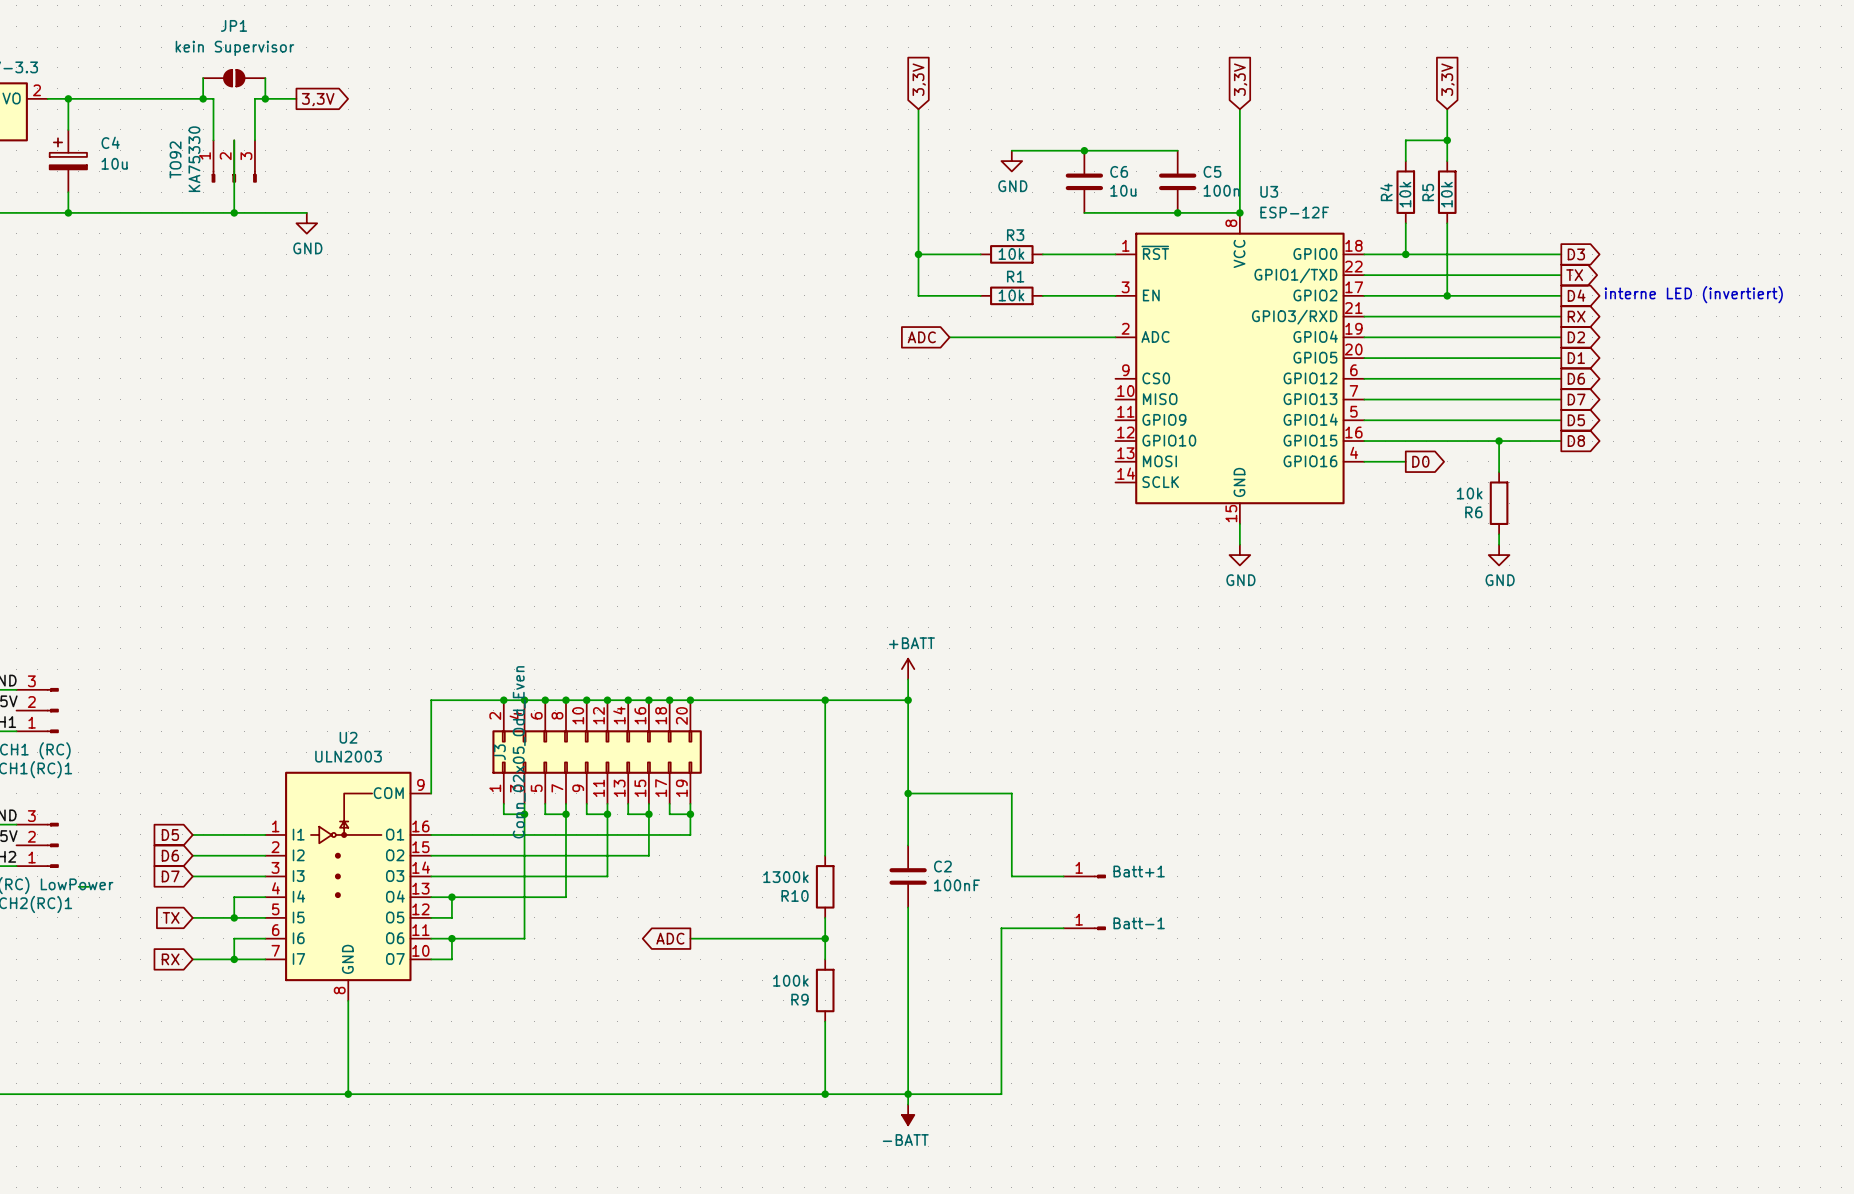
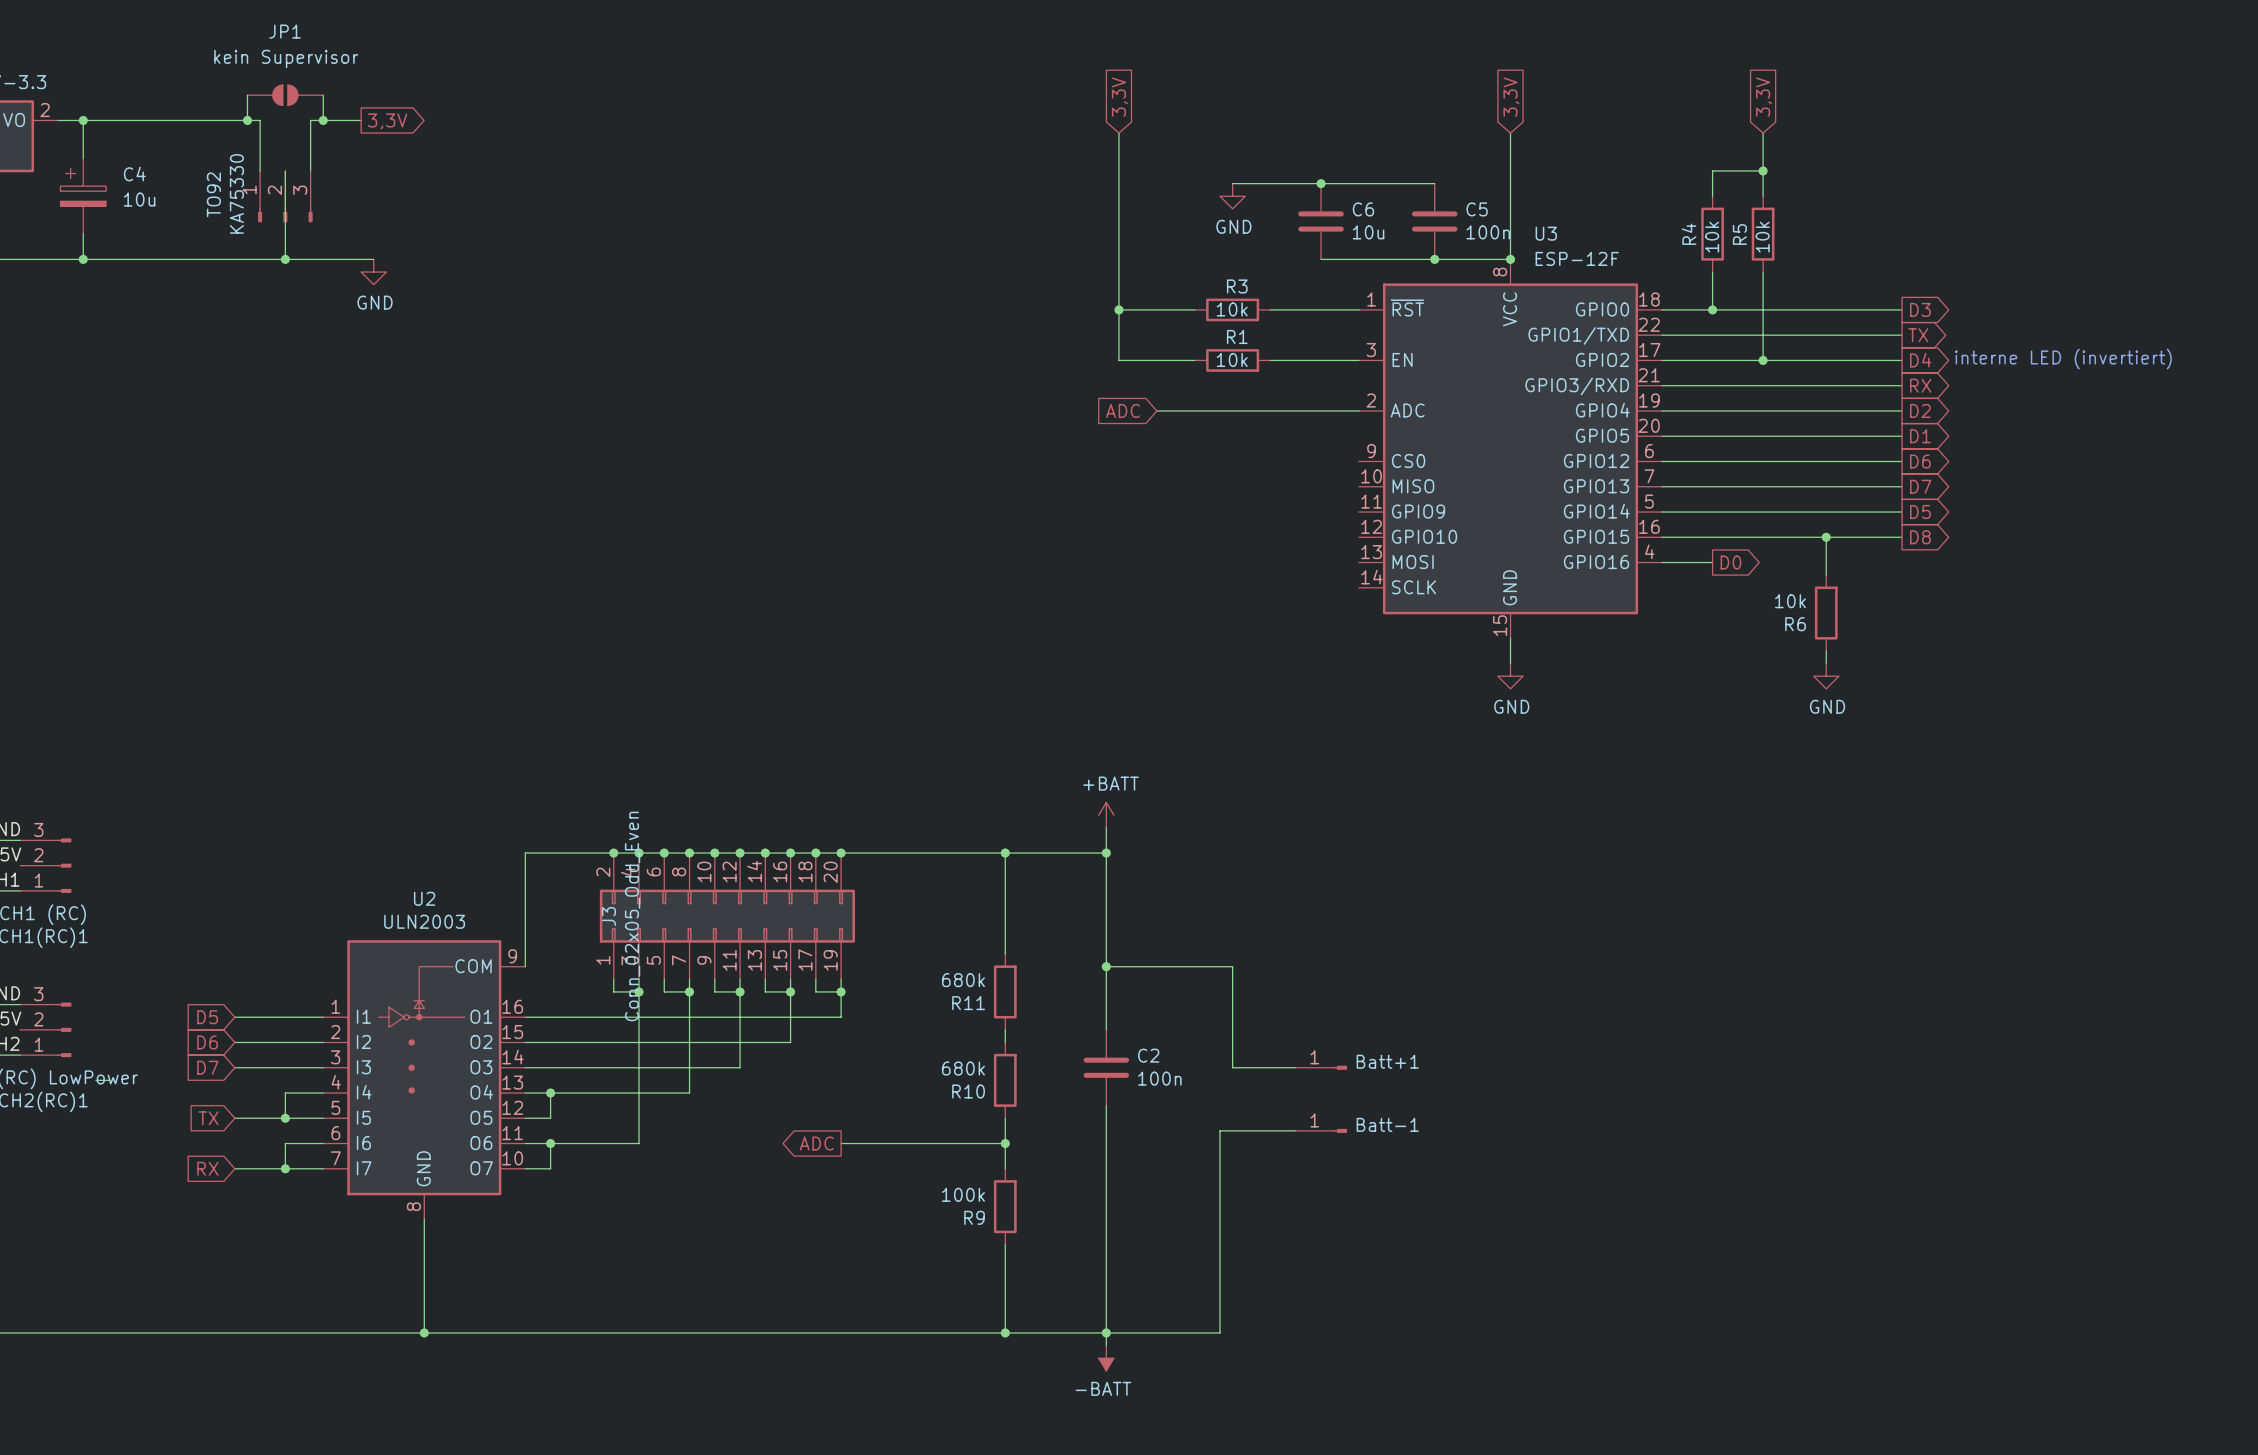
wire: (825, 783) (825, 845) -> none
R11: none -> 680k (1005, 991)
R10 value: 1300k (785, 877) -> 680k (963, 1068)
C2 value: 100nF (956, 885) -> 100n (1159, 1078)

